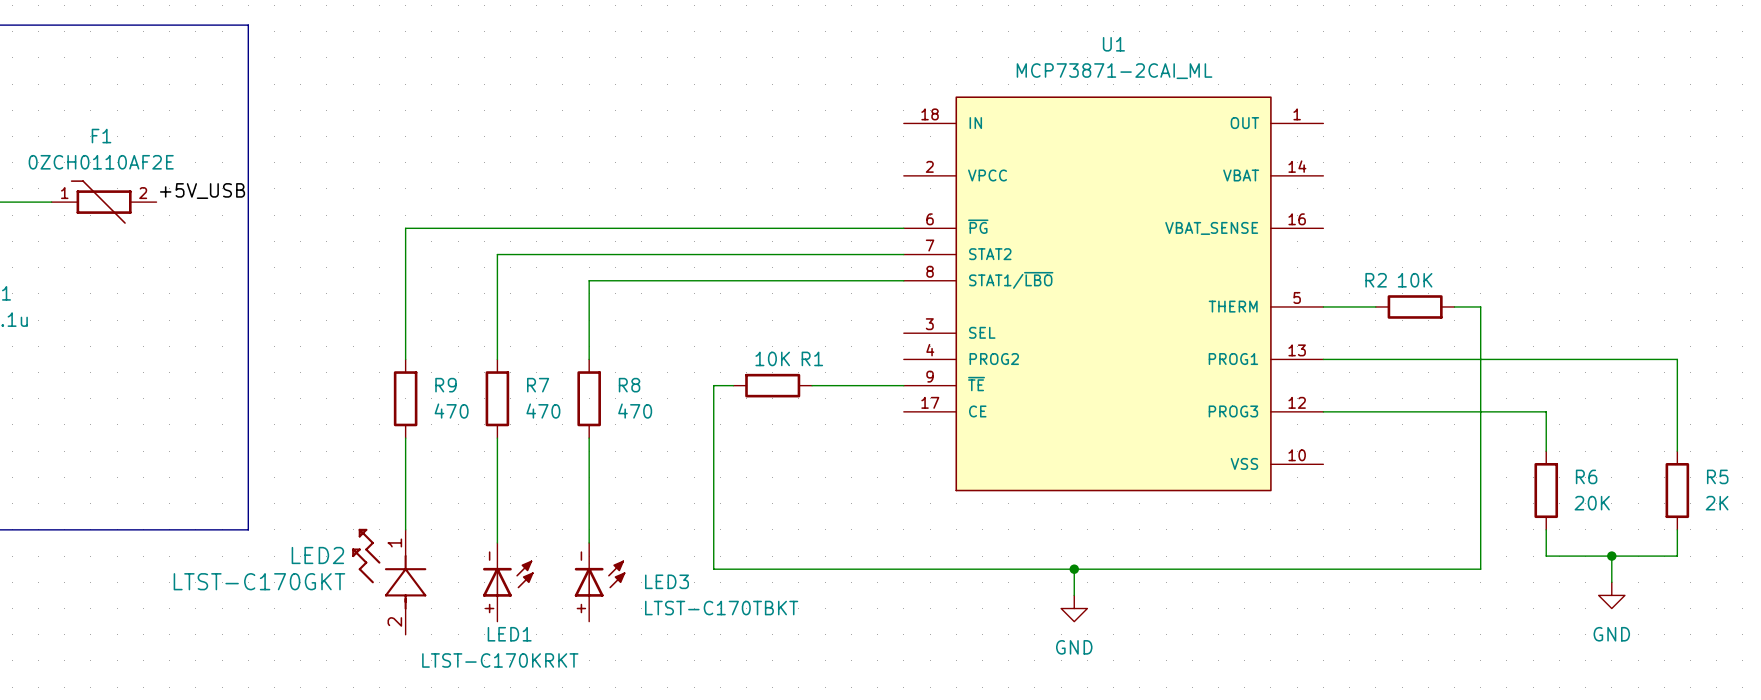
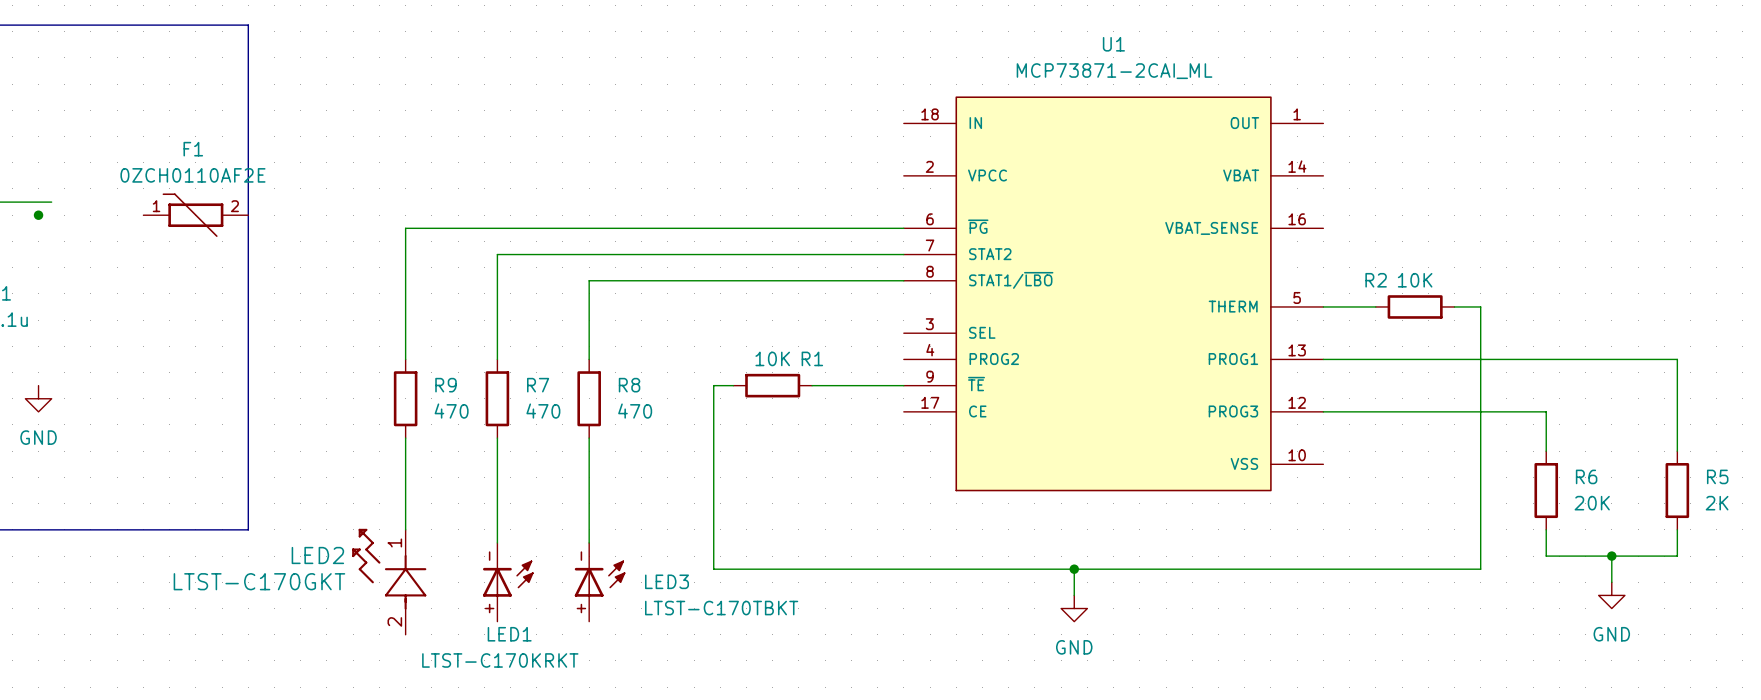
label: +5V_USB (202, 191) -> none
F1 position: (104, 202) -> (195, 215)
junction: none -> (38, 215)
power symbol: none -> GND (38, 398)

